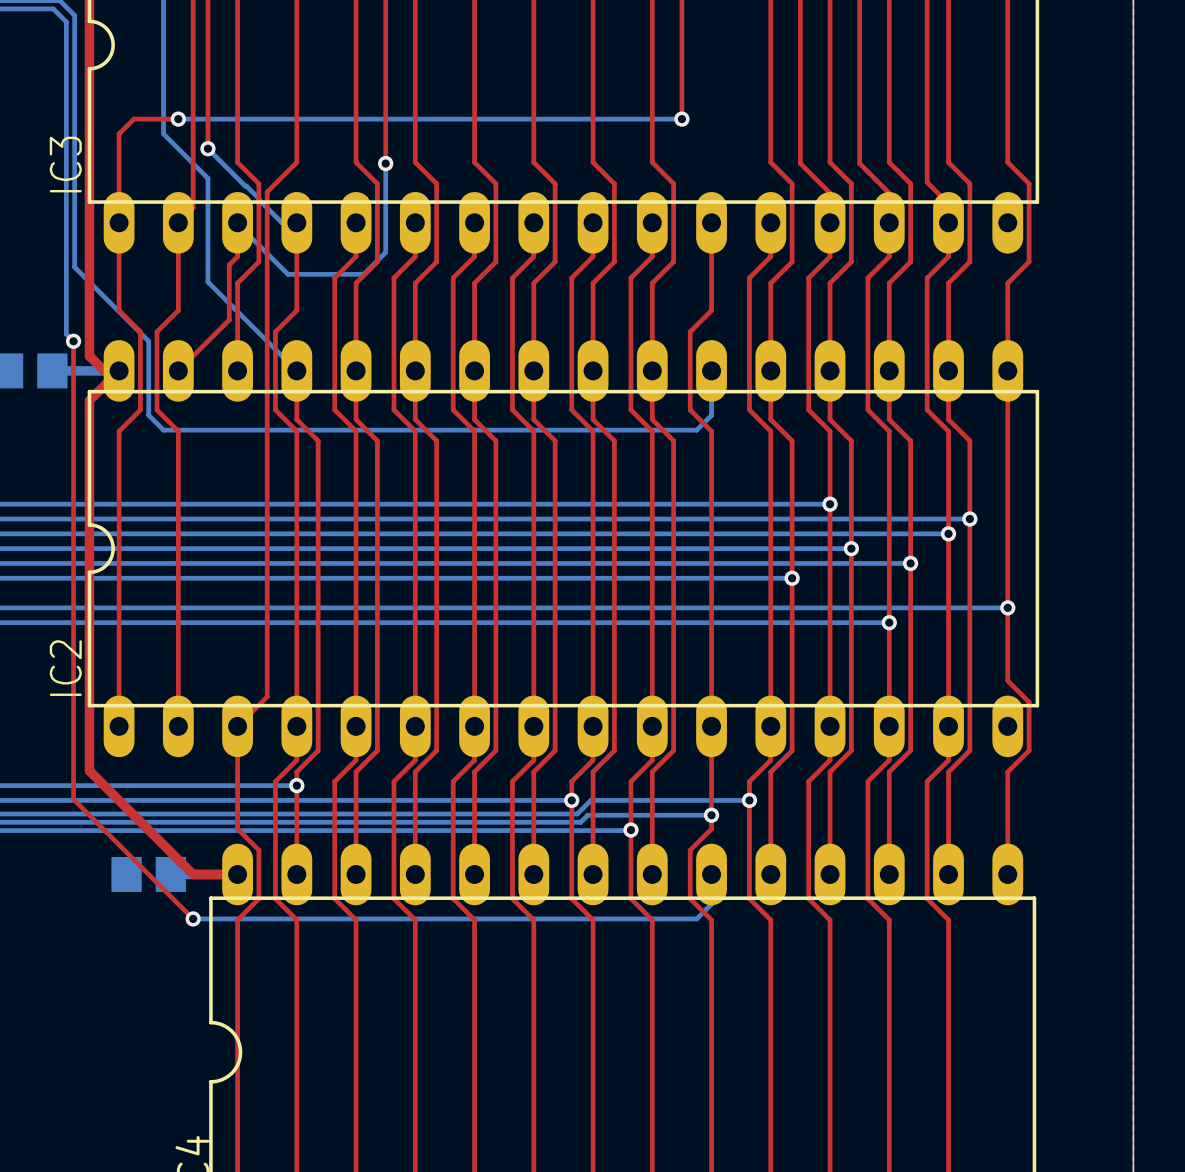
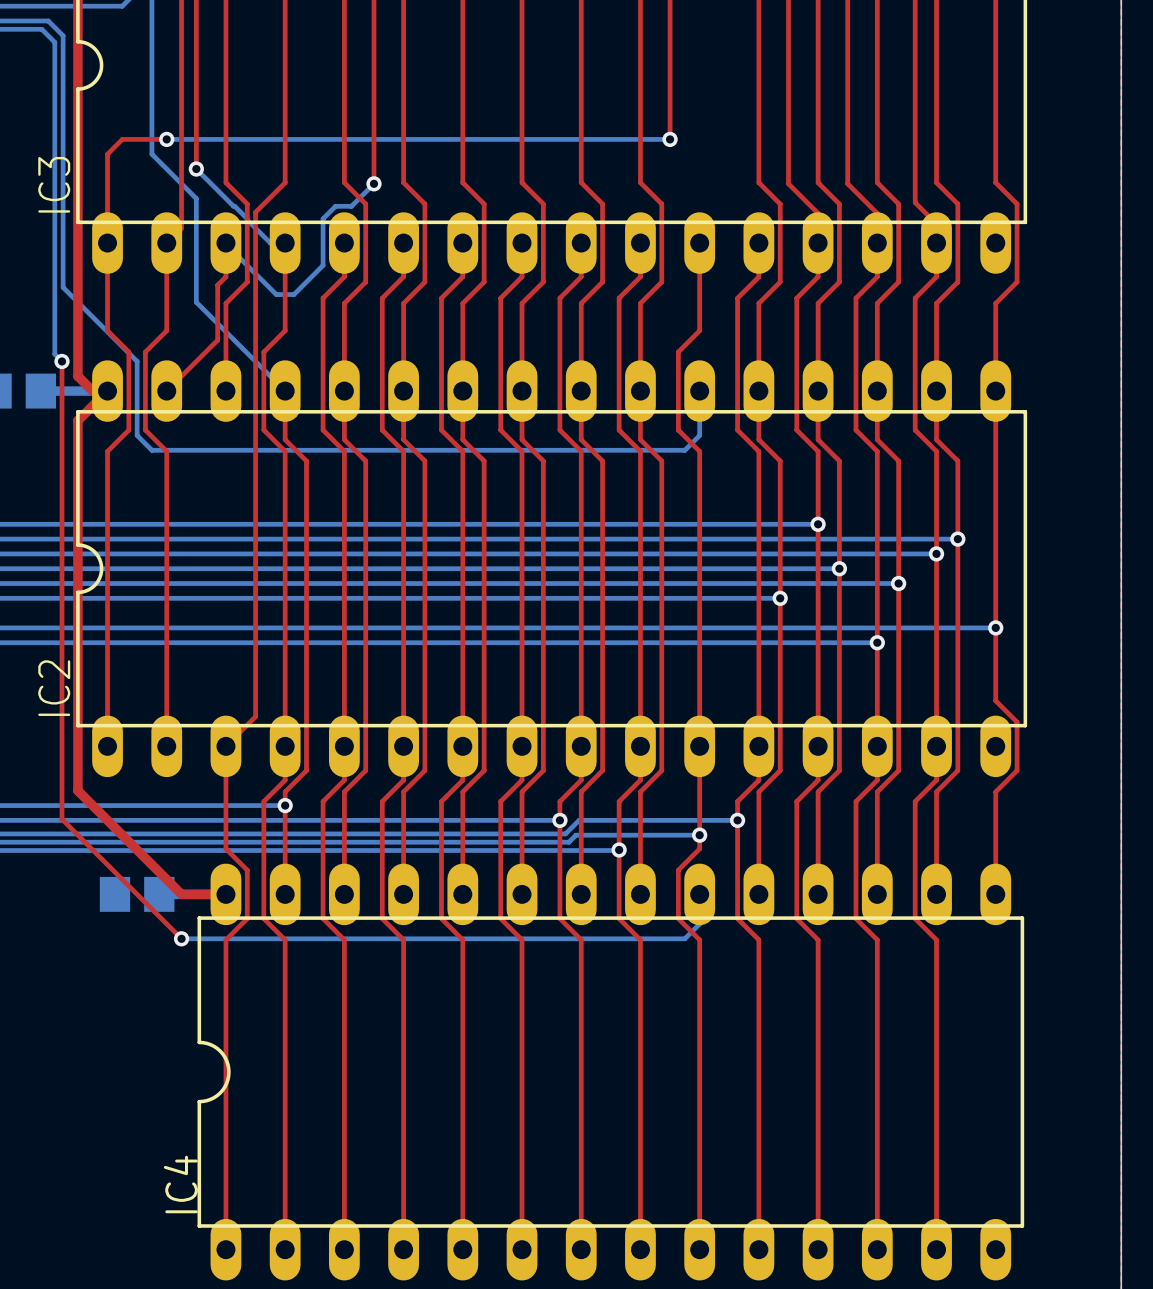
bottom track: (385, 163) (385, 252) (363, 274) (305, 274) -> (373, 183) (351, 206) (335, 206) (323, 218) (323, 265) (294, 294)

